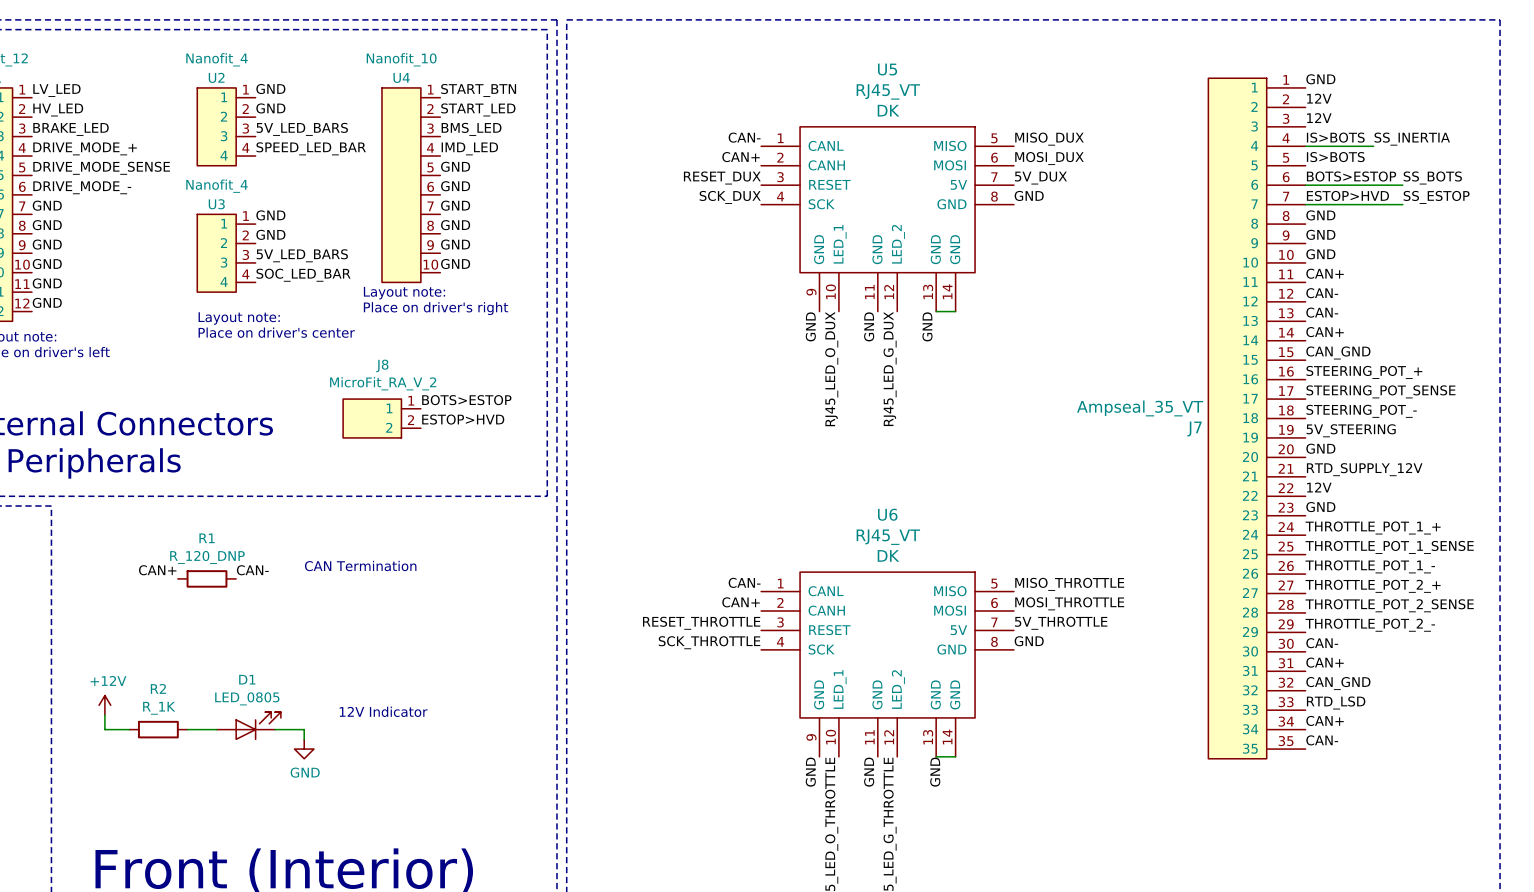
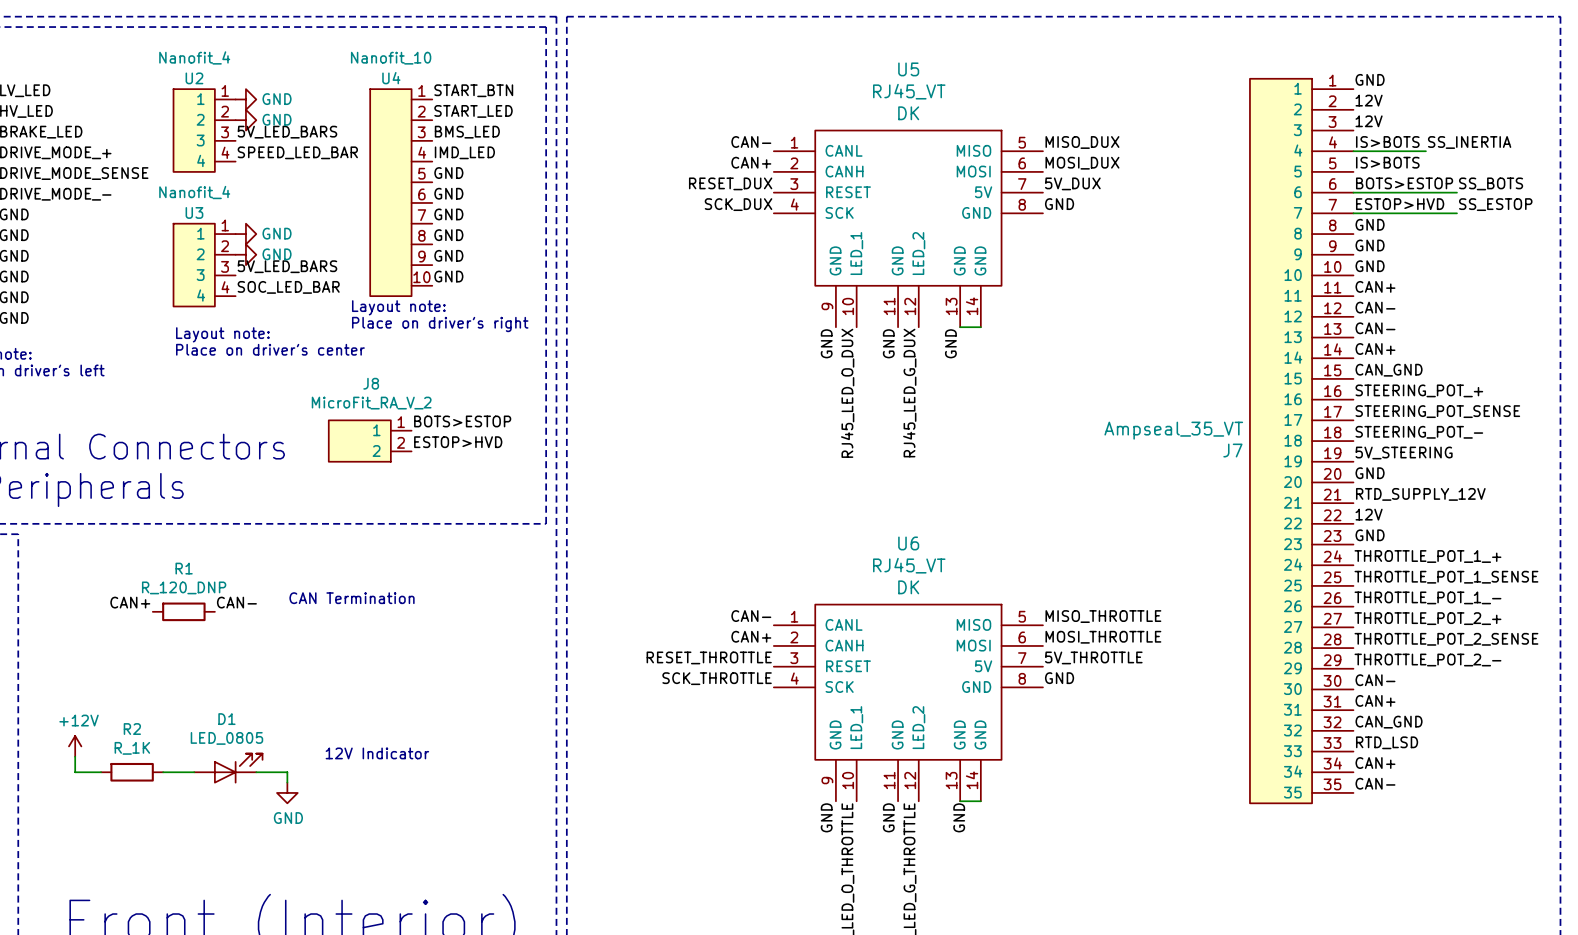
label: GND (270, 89) -> none
power symbol: none -> GND (245, 99)
label: GND (270, 108) -> none
power symbol: none -> GND (245, 120)
label: GND (270, 215) -> none
power symbol: none -> GND (245, 234)
label: GND (270, 234) -> none
power symbol: none -> GND (245, 254)

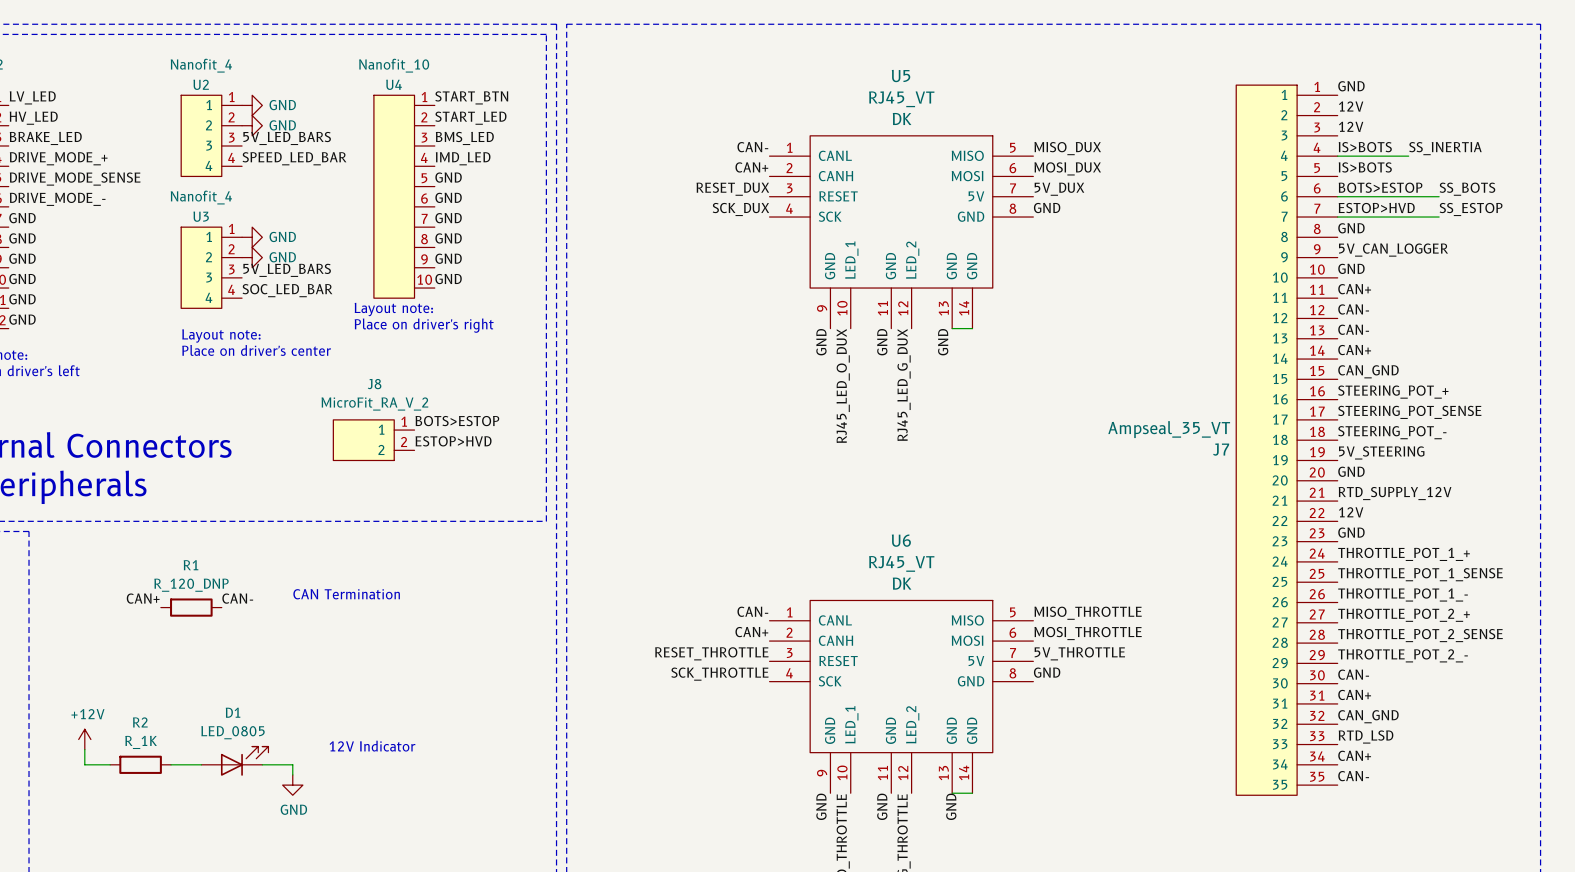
label: GND (1370, 245) -> 5V_CAN_LOGGER (1393, 250)

